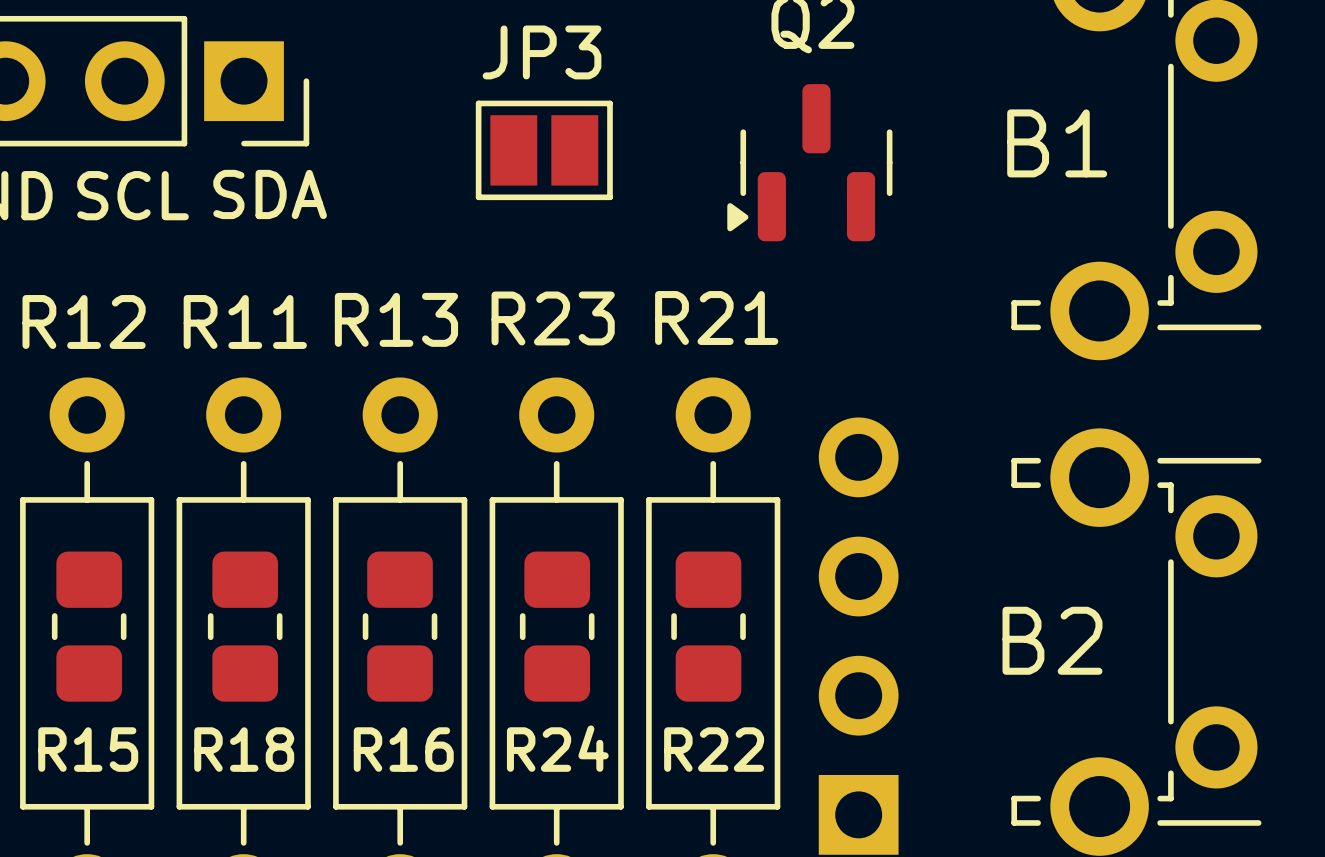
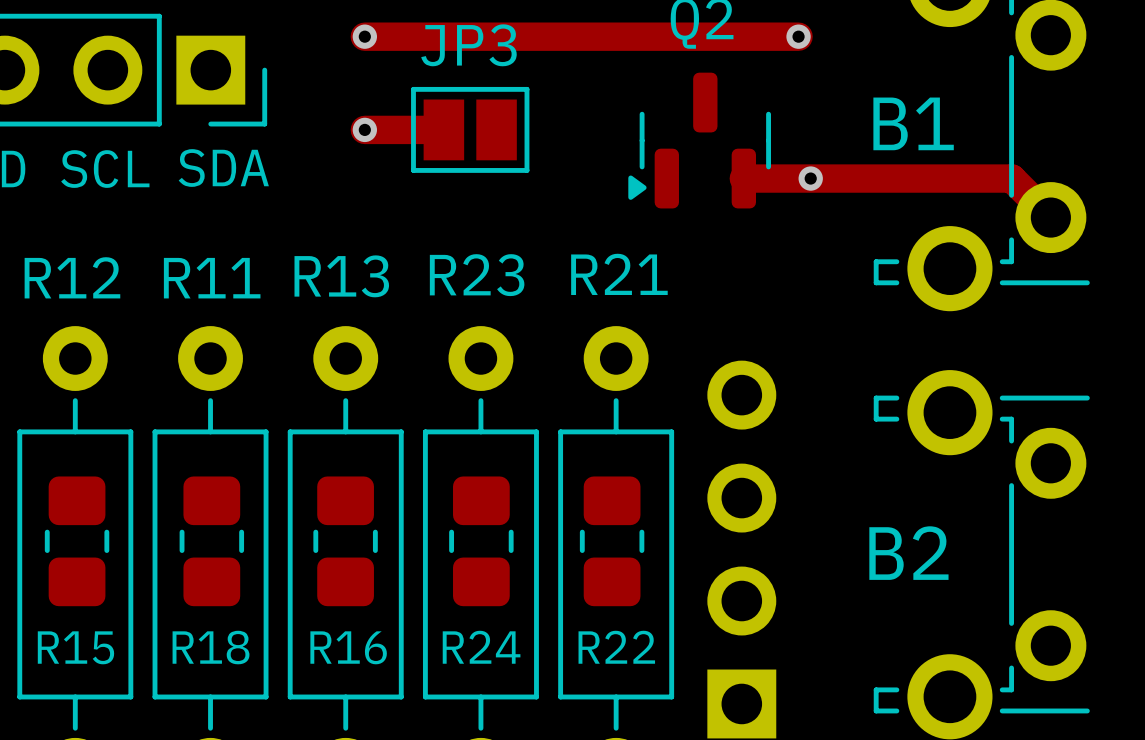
track: none -> (364, 36) (798, 36)
via: none -> (364, 36)
via: none -> (798, 36)
track: none -> (364, 129) (443, 129)
via: none -> (364, 129)
track: none -> (743, 178) (1011, 178) (1050, 217)
via: none -> (810, 178)

